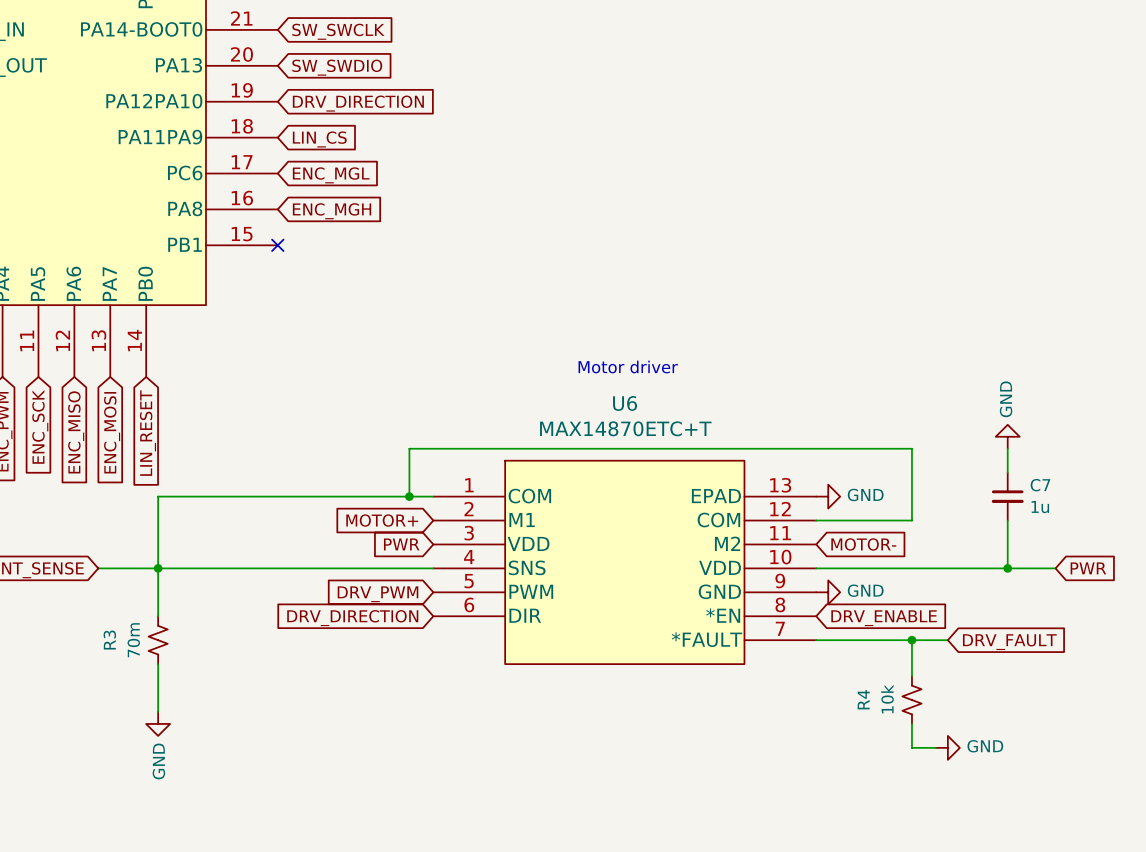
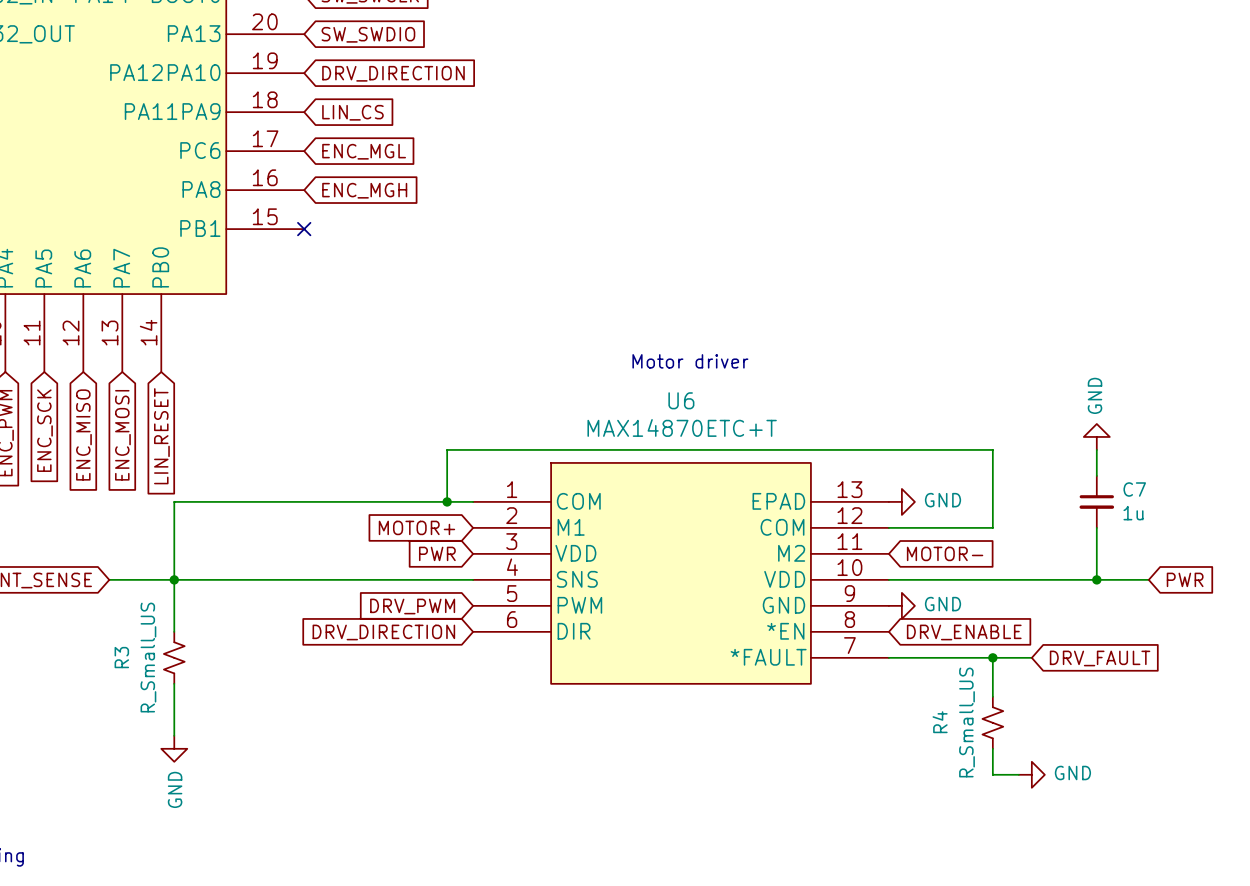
R3 value: 70m (133, 640) -> R_Small_US (148, 657)
R4 value: 10k (887, 699) -> R_Small_US (967, 722)

